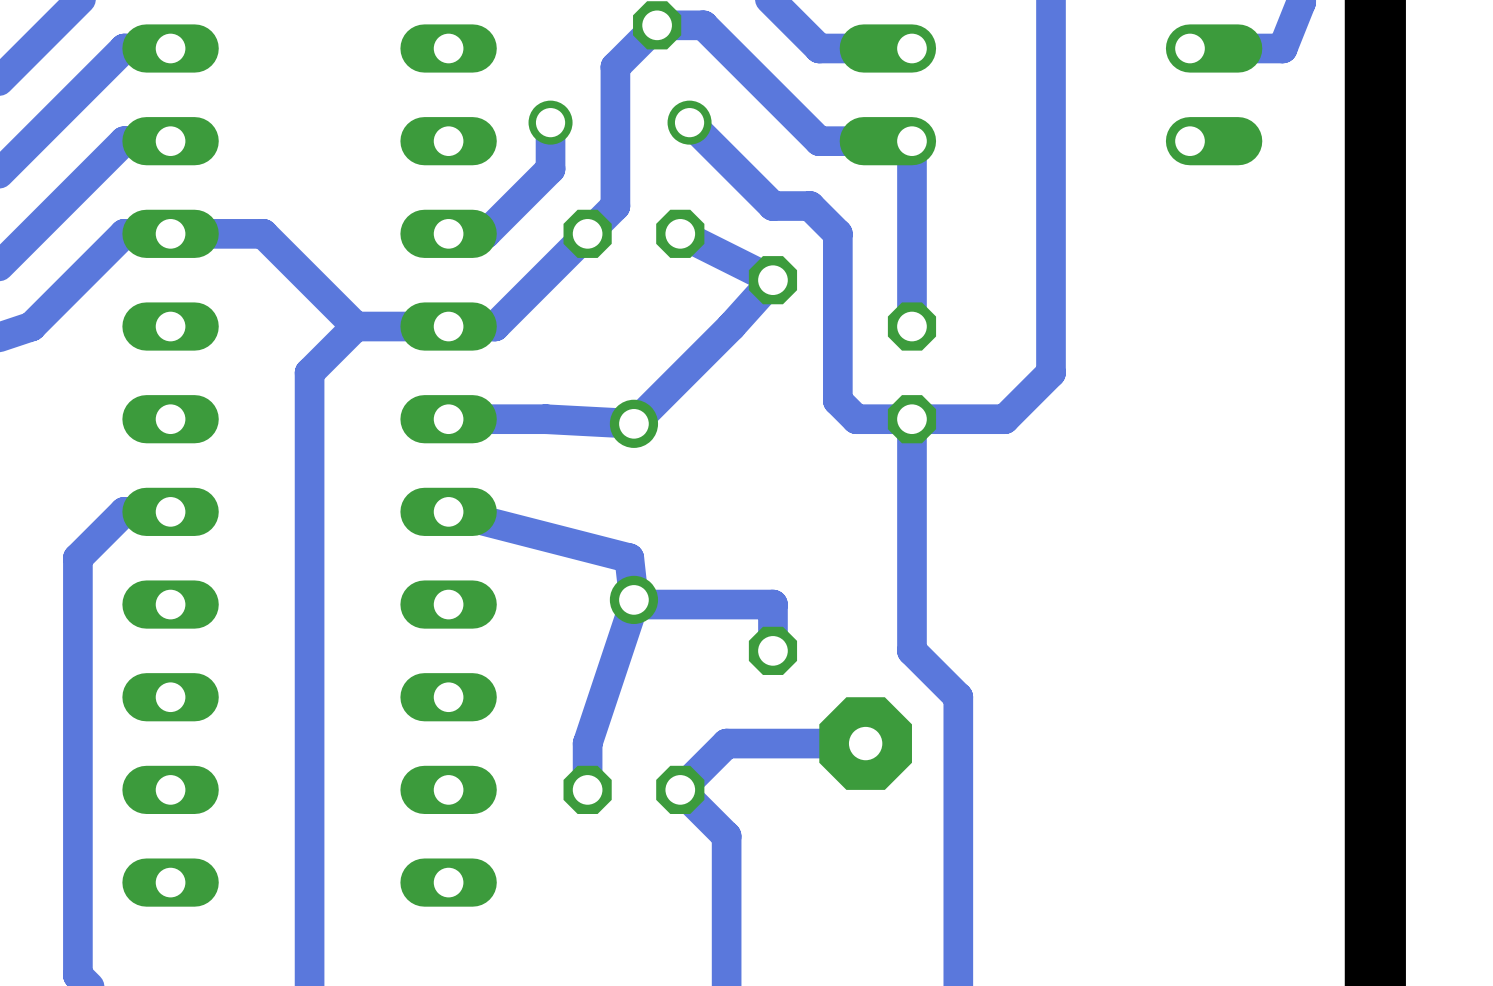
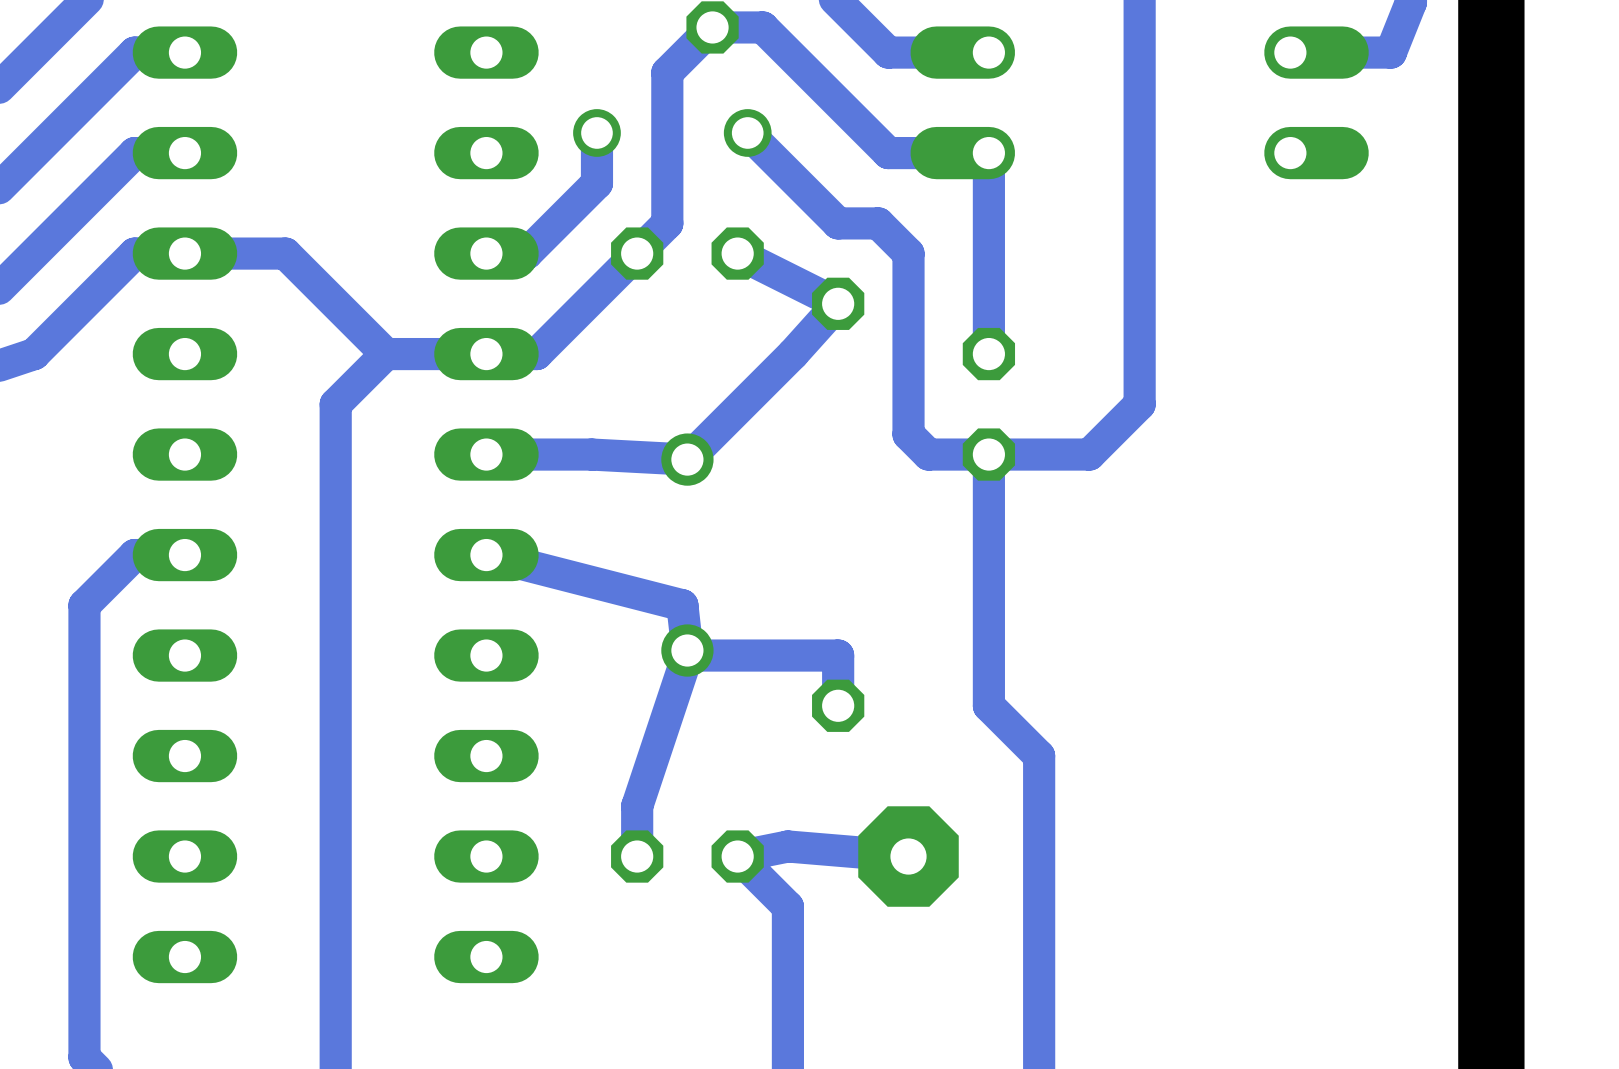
track: (865, 743) (726, 743) (680, 789) -> (908, 856) (787, 846) (737, 856)
part position: (865, 743) -> (908, 856)

